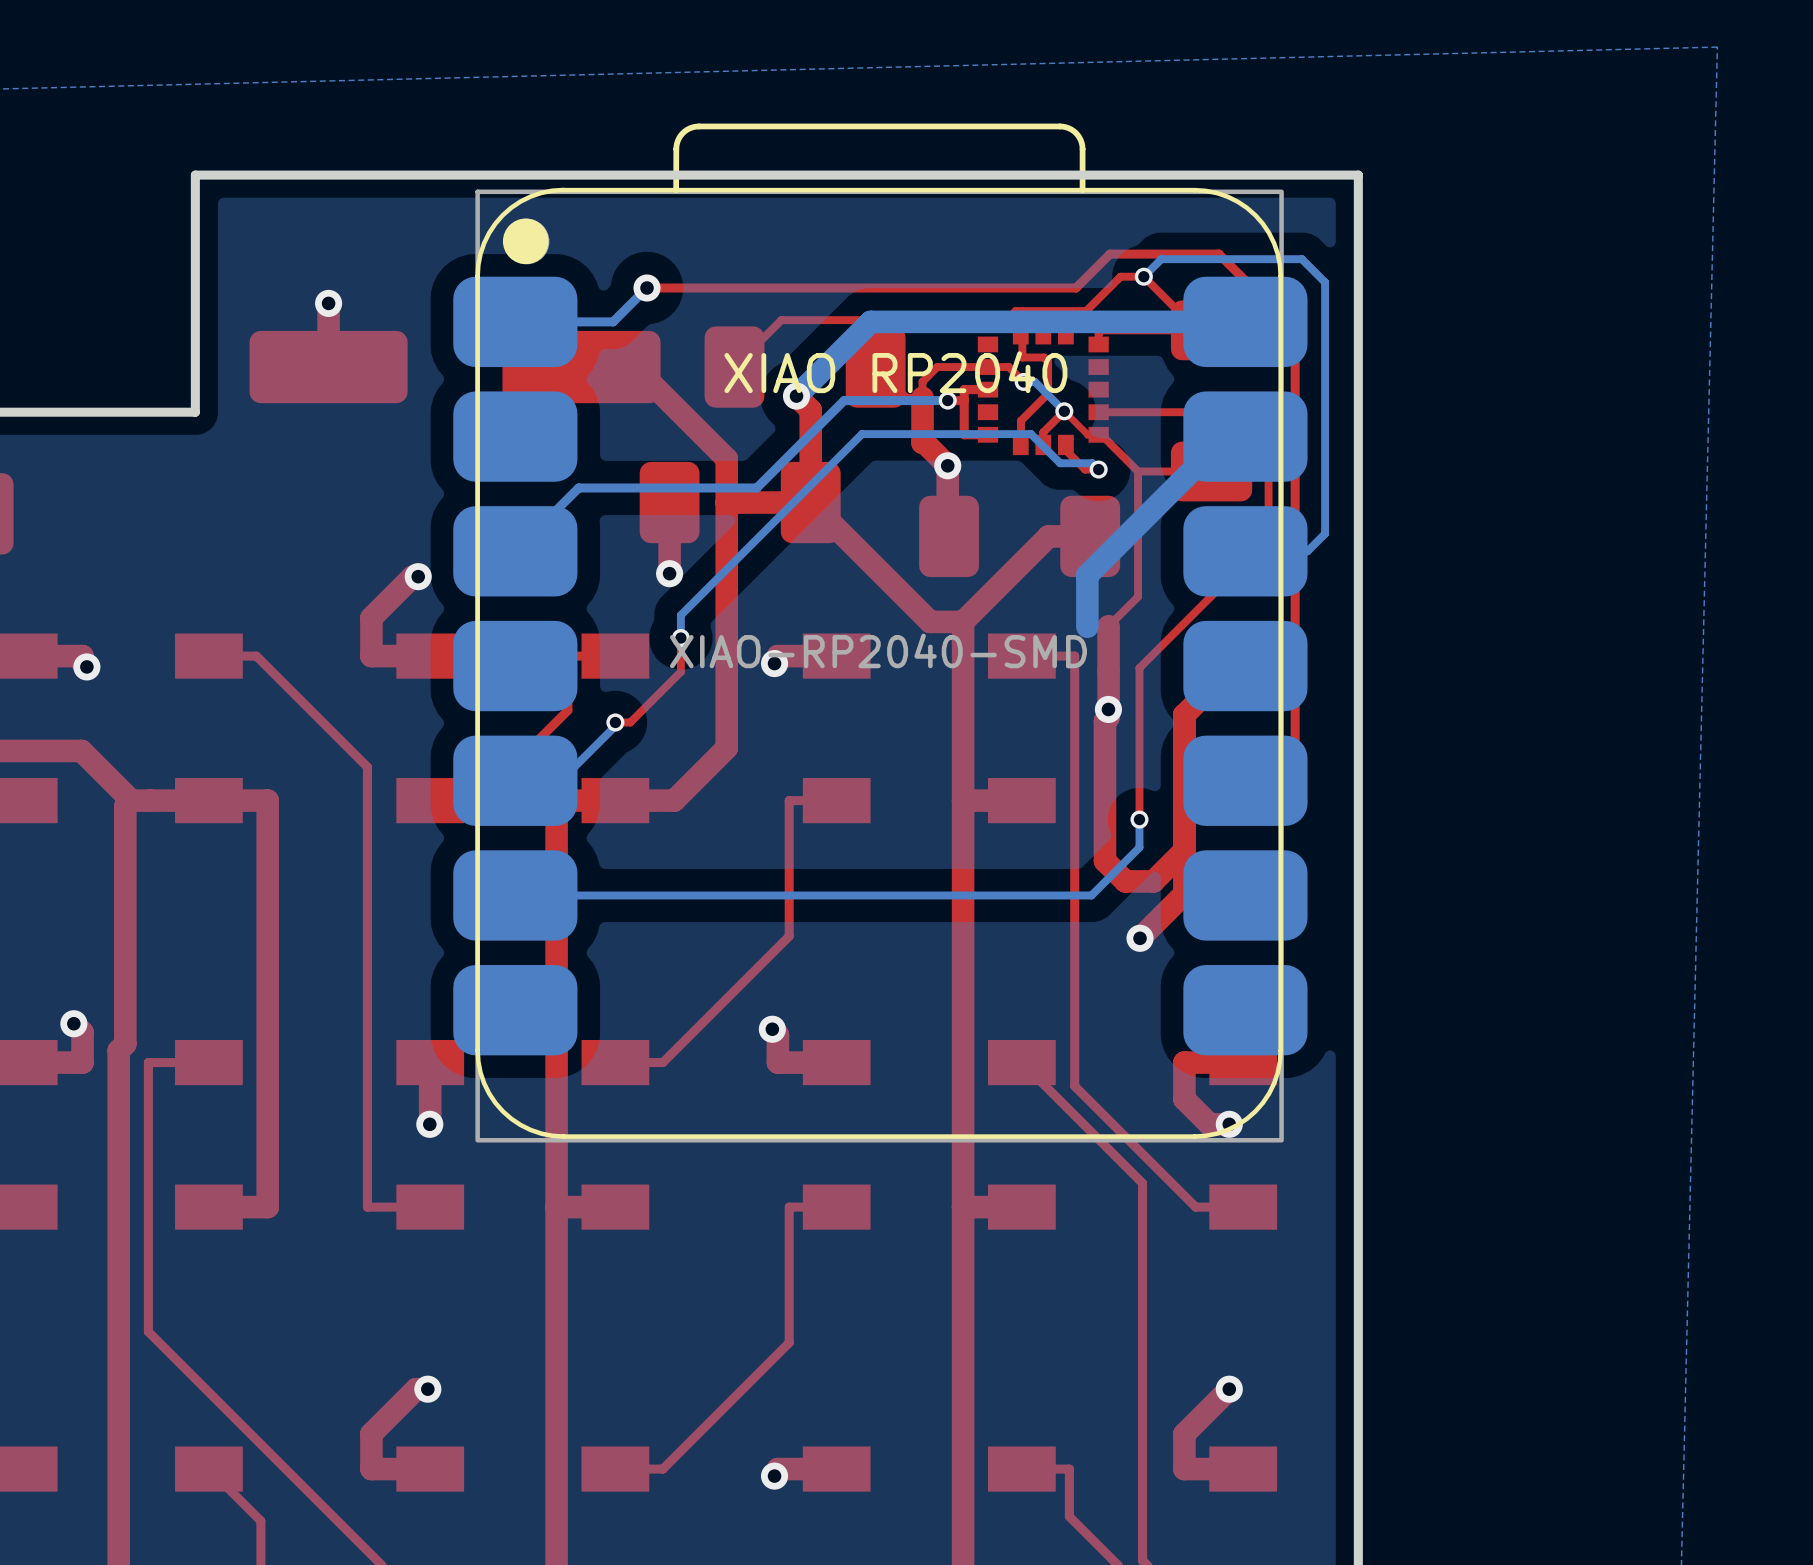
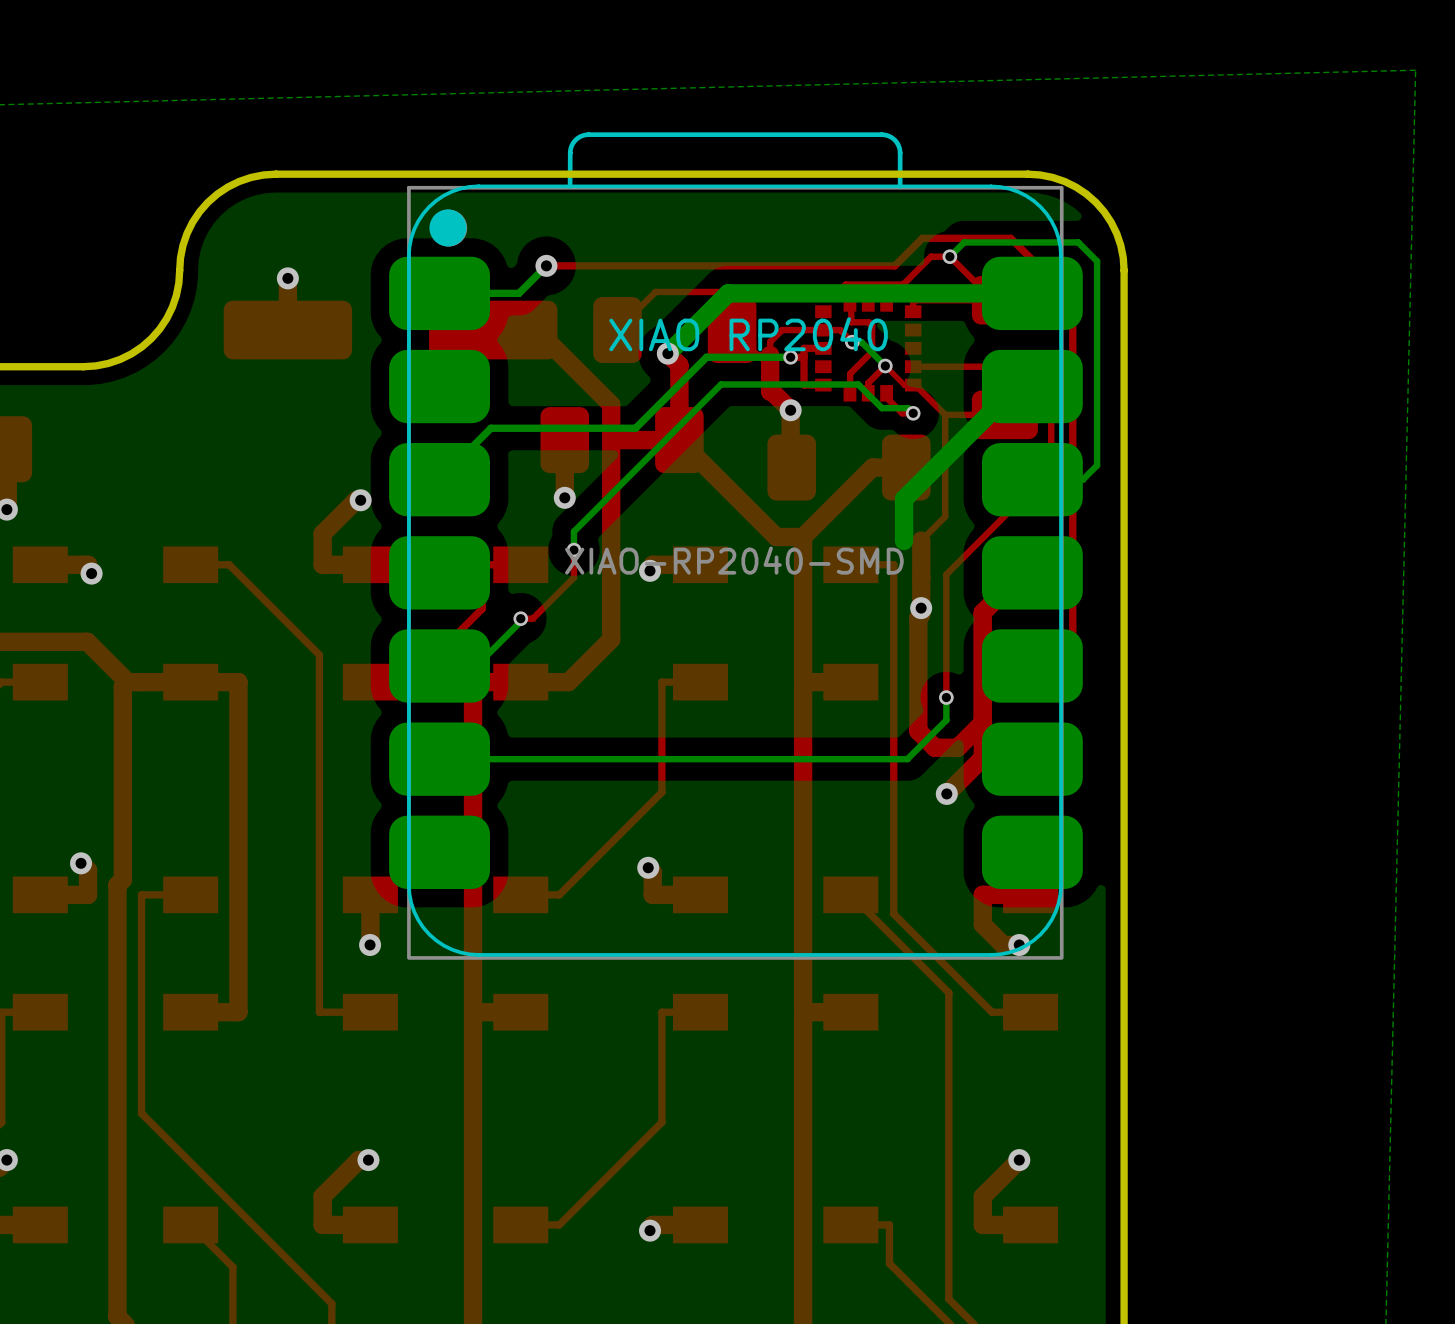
board edge: (313, 175) (195, 175) (195, 412) (76, 412) -> (275, 174) (263, 175) (239, 181) (217, 194) (207, 202) (192, 222) (187, 233) (180, 257) (176, 295) (166, 318) (159, 329) (142, 346) (120, 359) (95, 365) (83, 366)
board edge: (1239, 175) (1358, 175) (1358, 293) -> (1027, 174) (1040, 175) (1064, 181) (1075, 187) (1095, 202) (1111, 222) (1116, 233) (1123, 257) (1124, 270)

